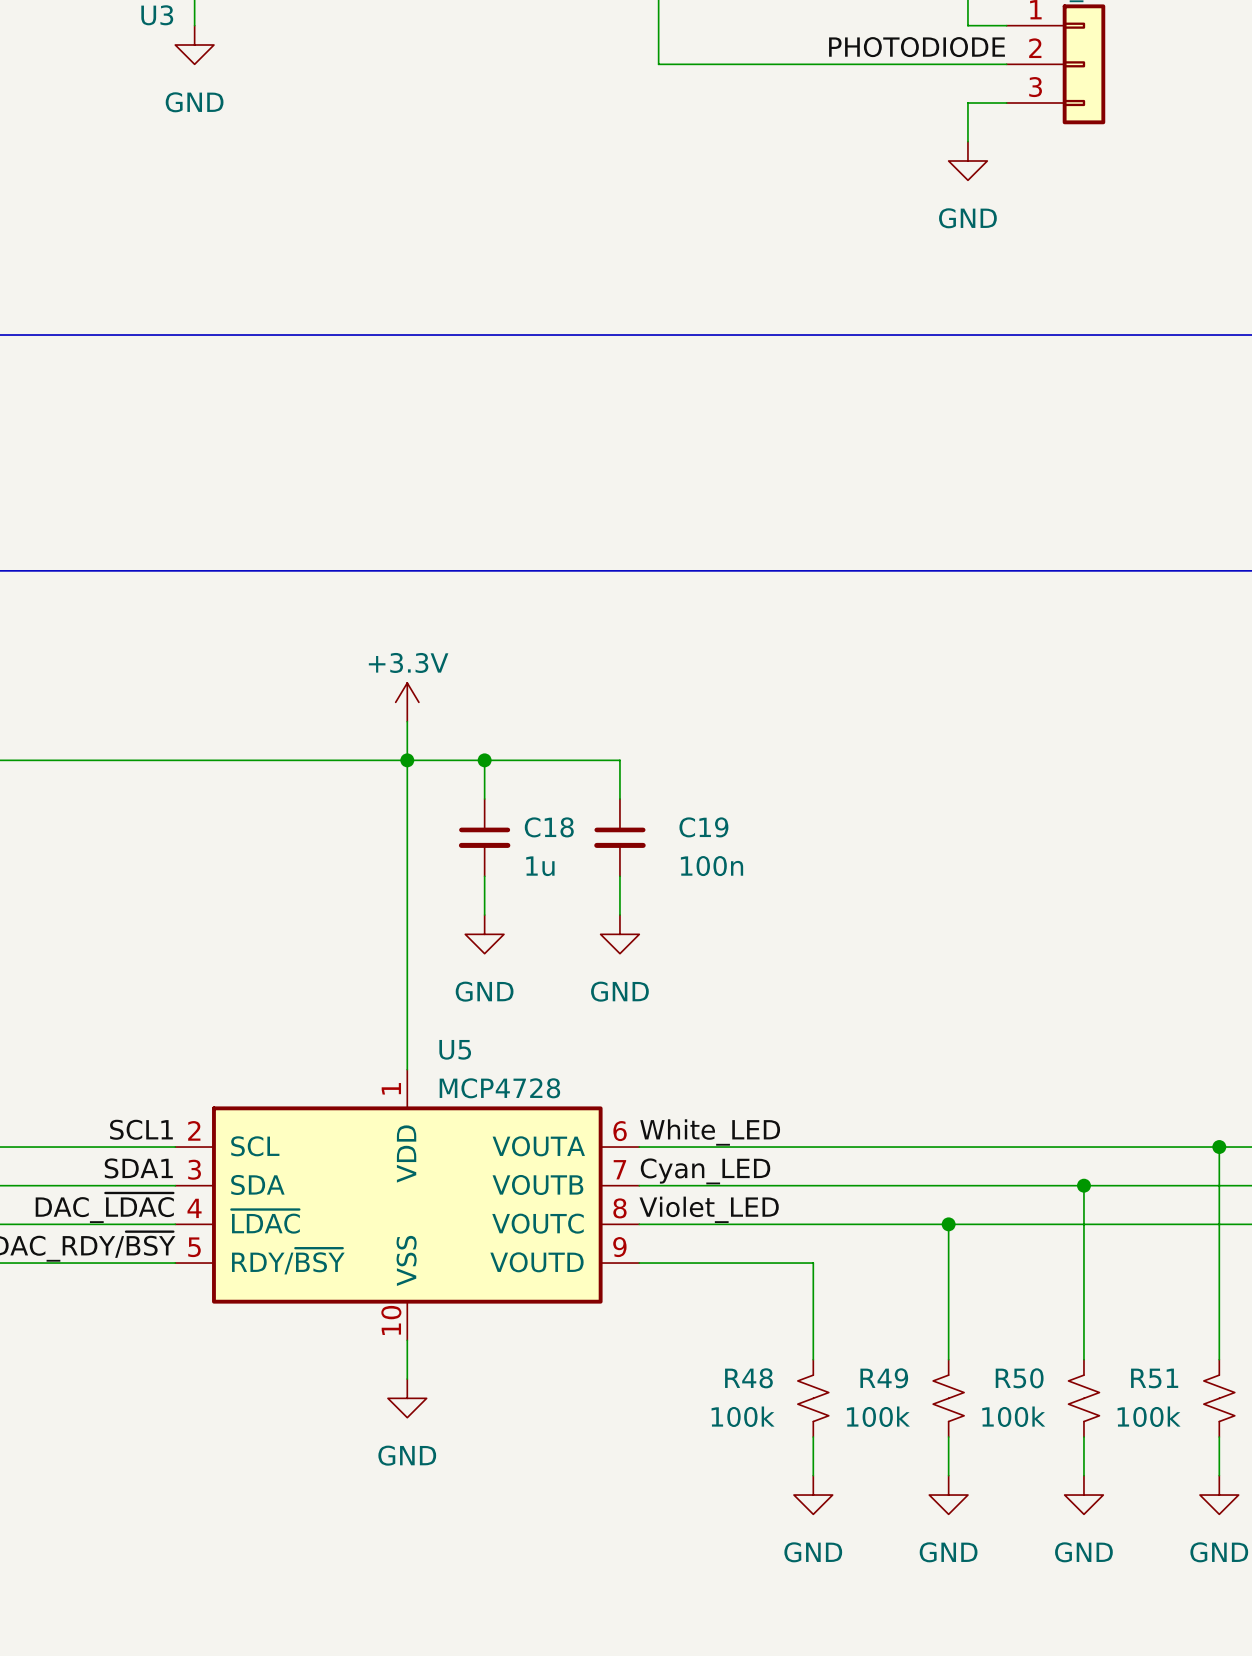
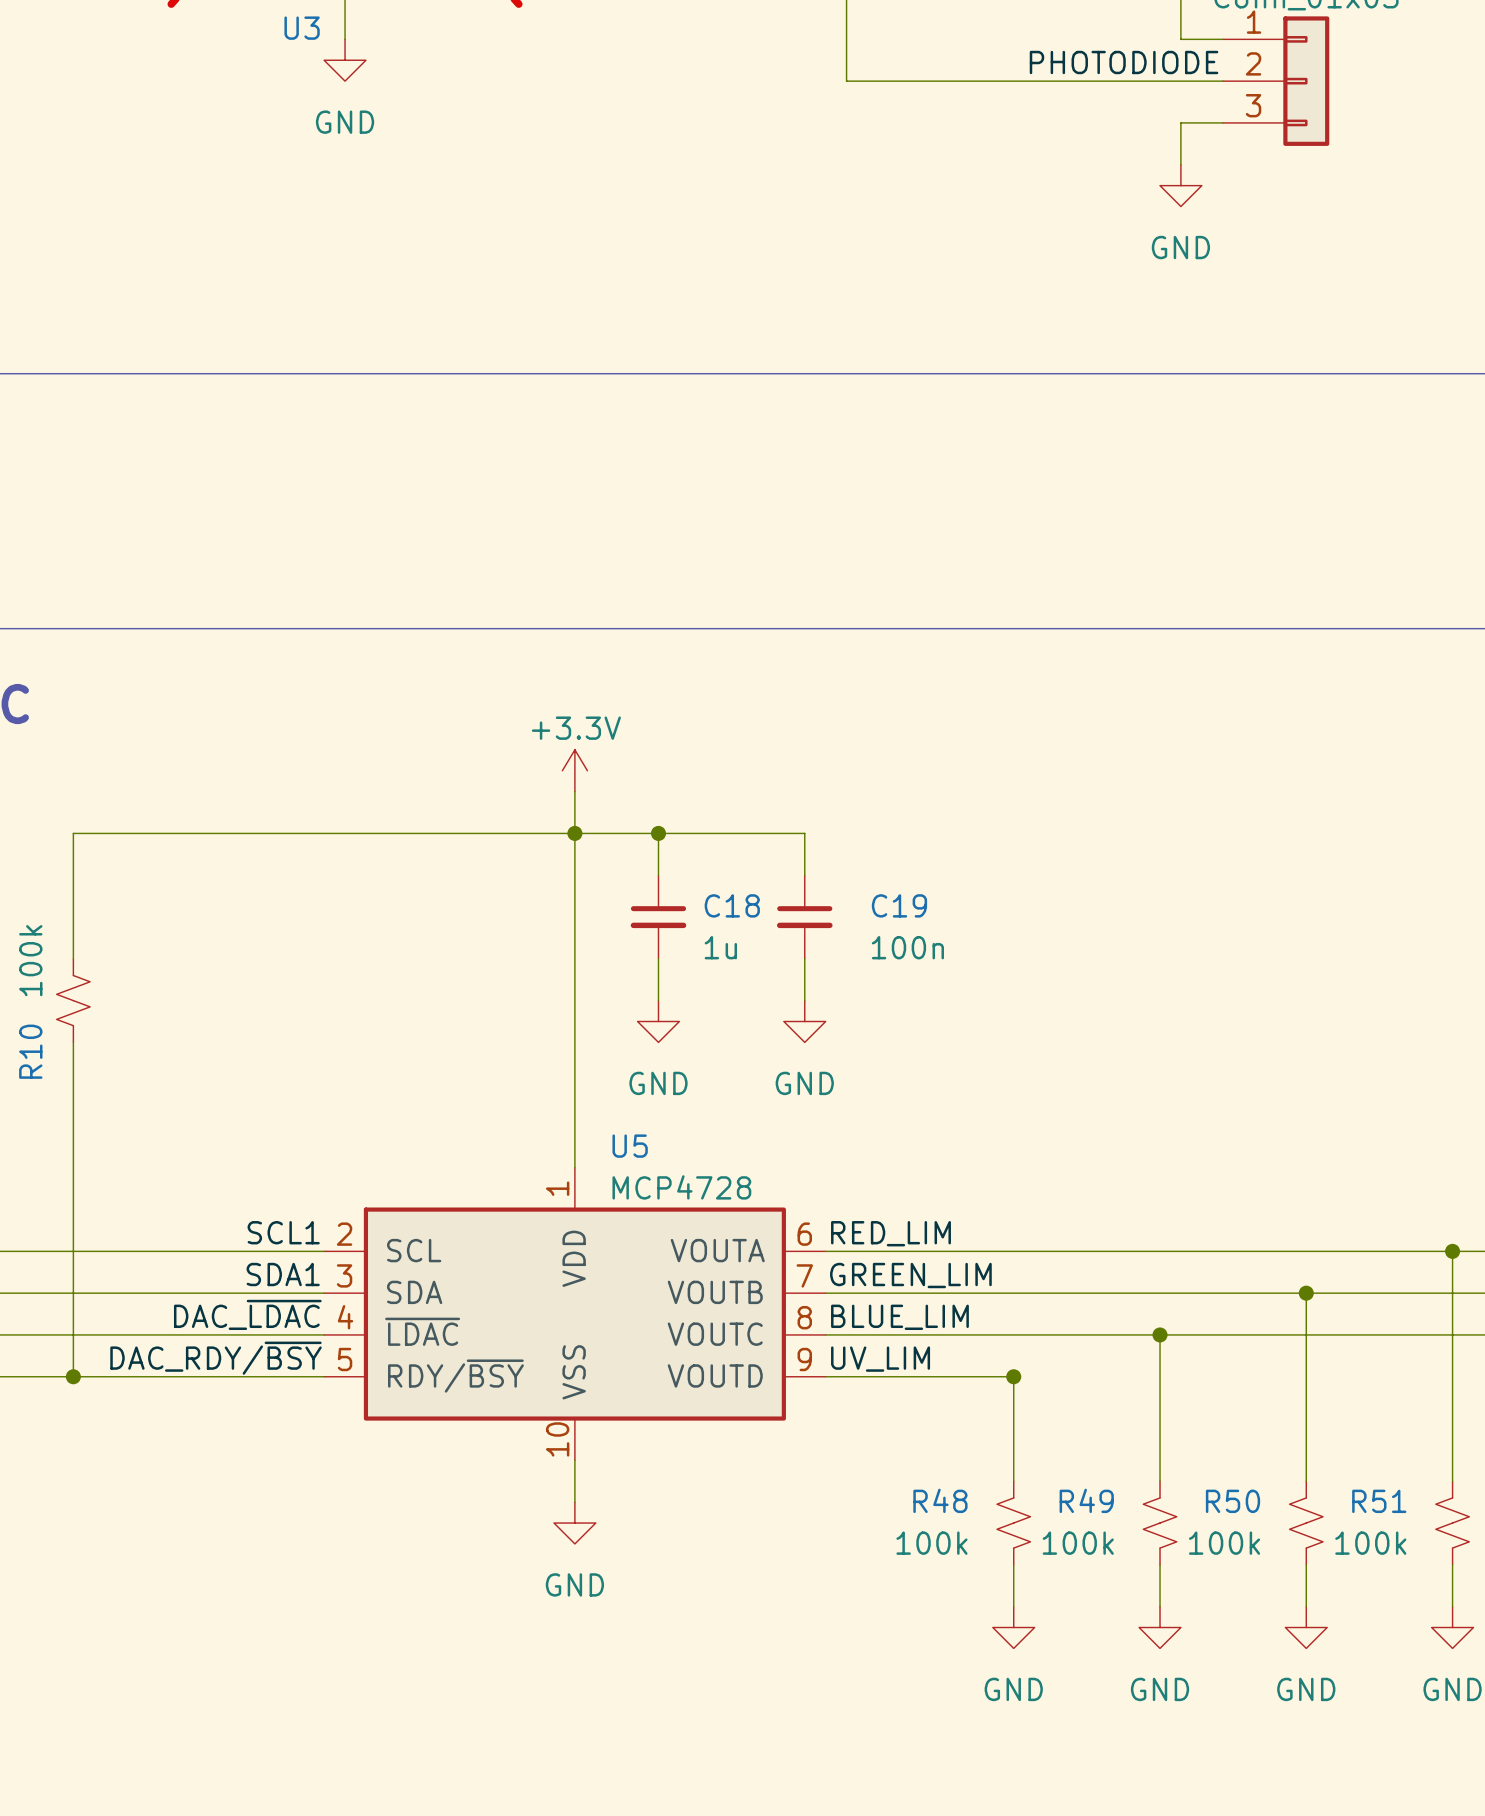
label: White_LED (710, 1132) -> RED_LIM (891, 1233)
label: Cyan_LED (705, 1171) -> GREEN_LIM (910, 1275)
label: Violet_LED (709, 1209) -> BLUE_LIM (899, 1317)
label: none -> UV_LIM (880, 1359)
junction: none -> (1013, 1376)

